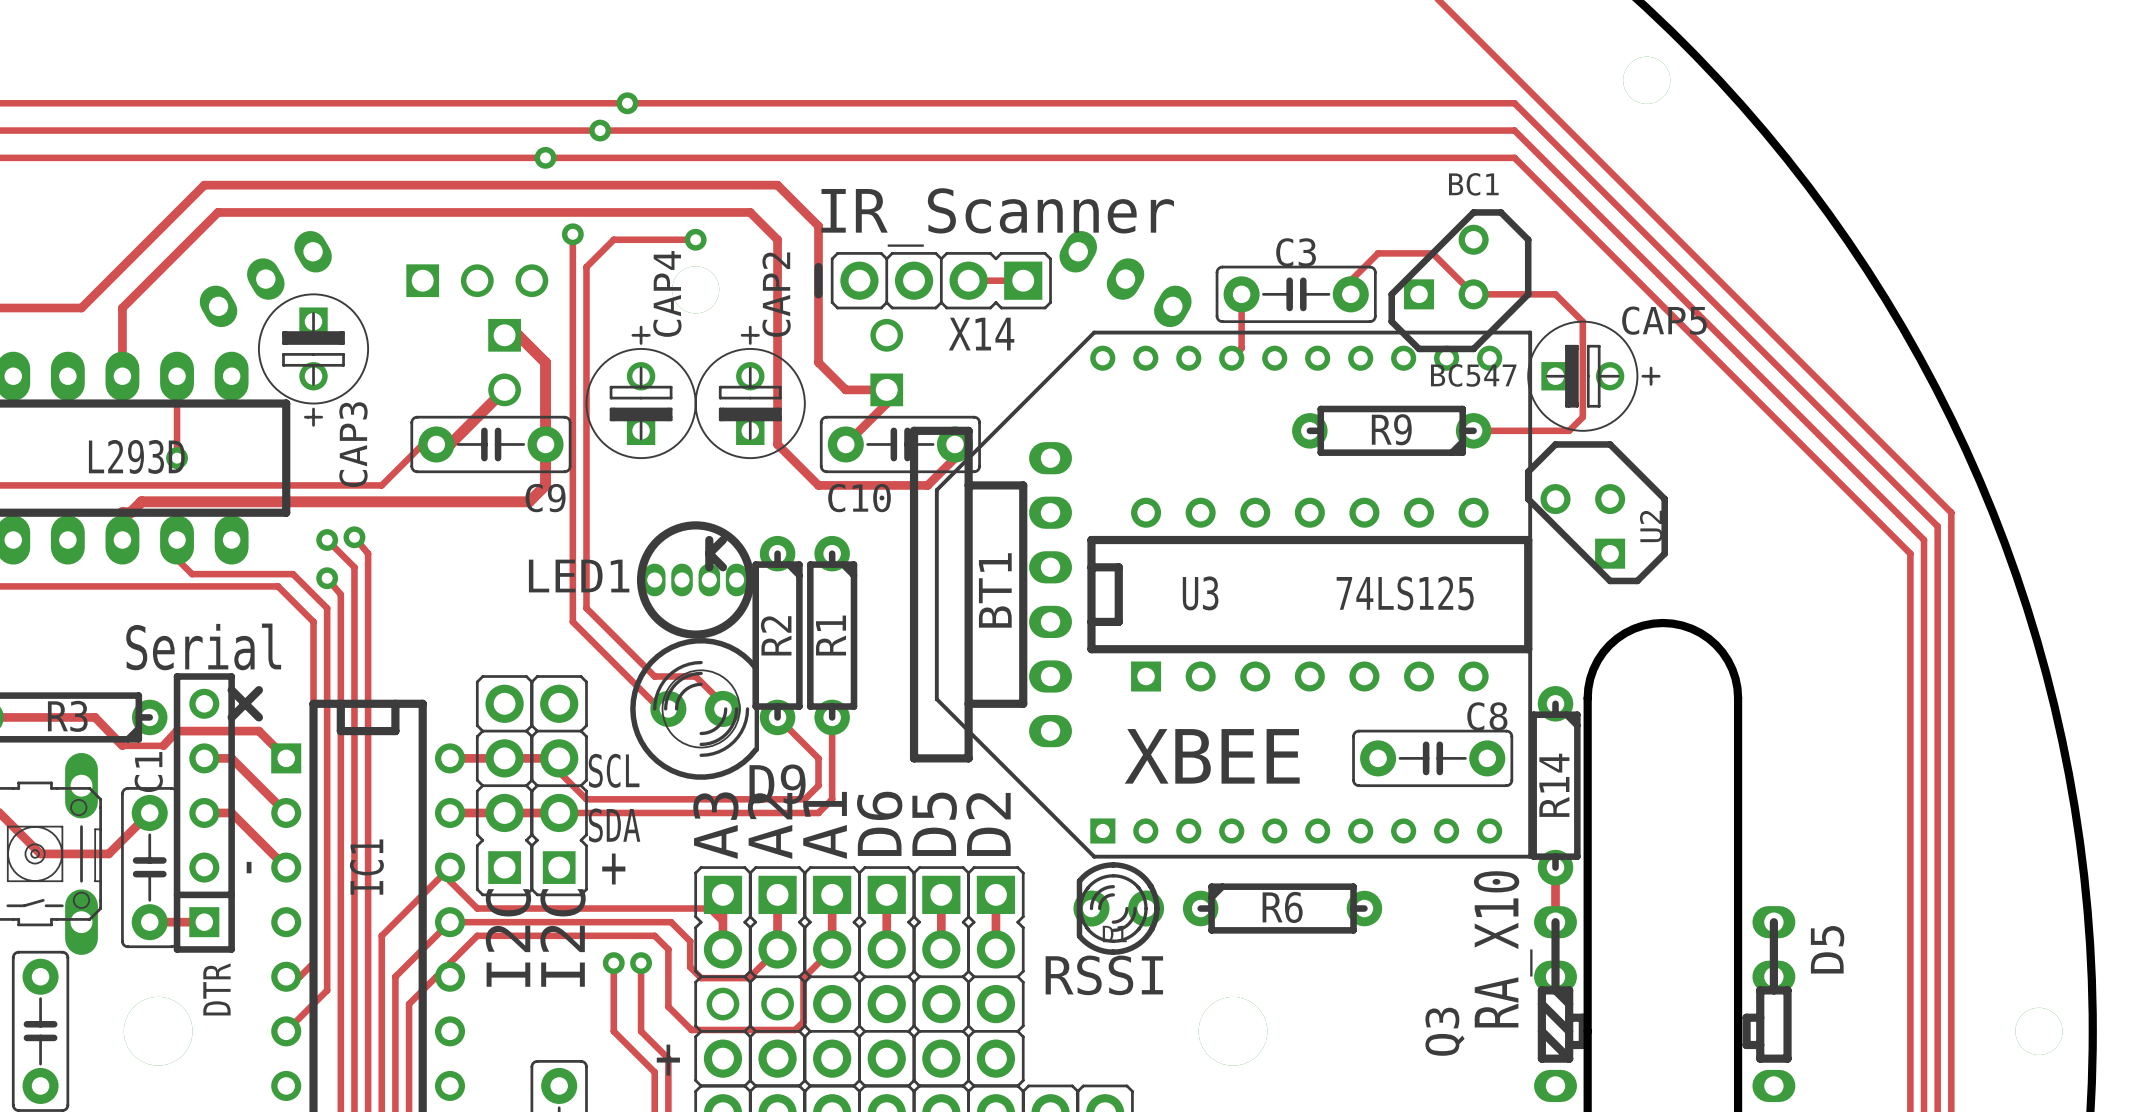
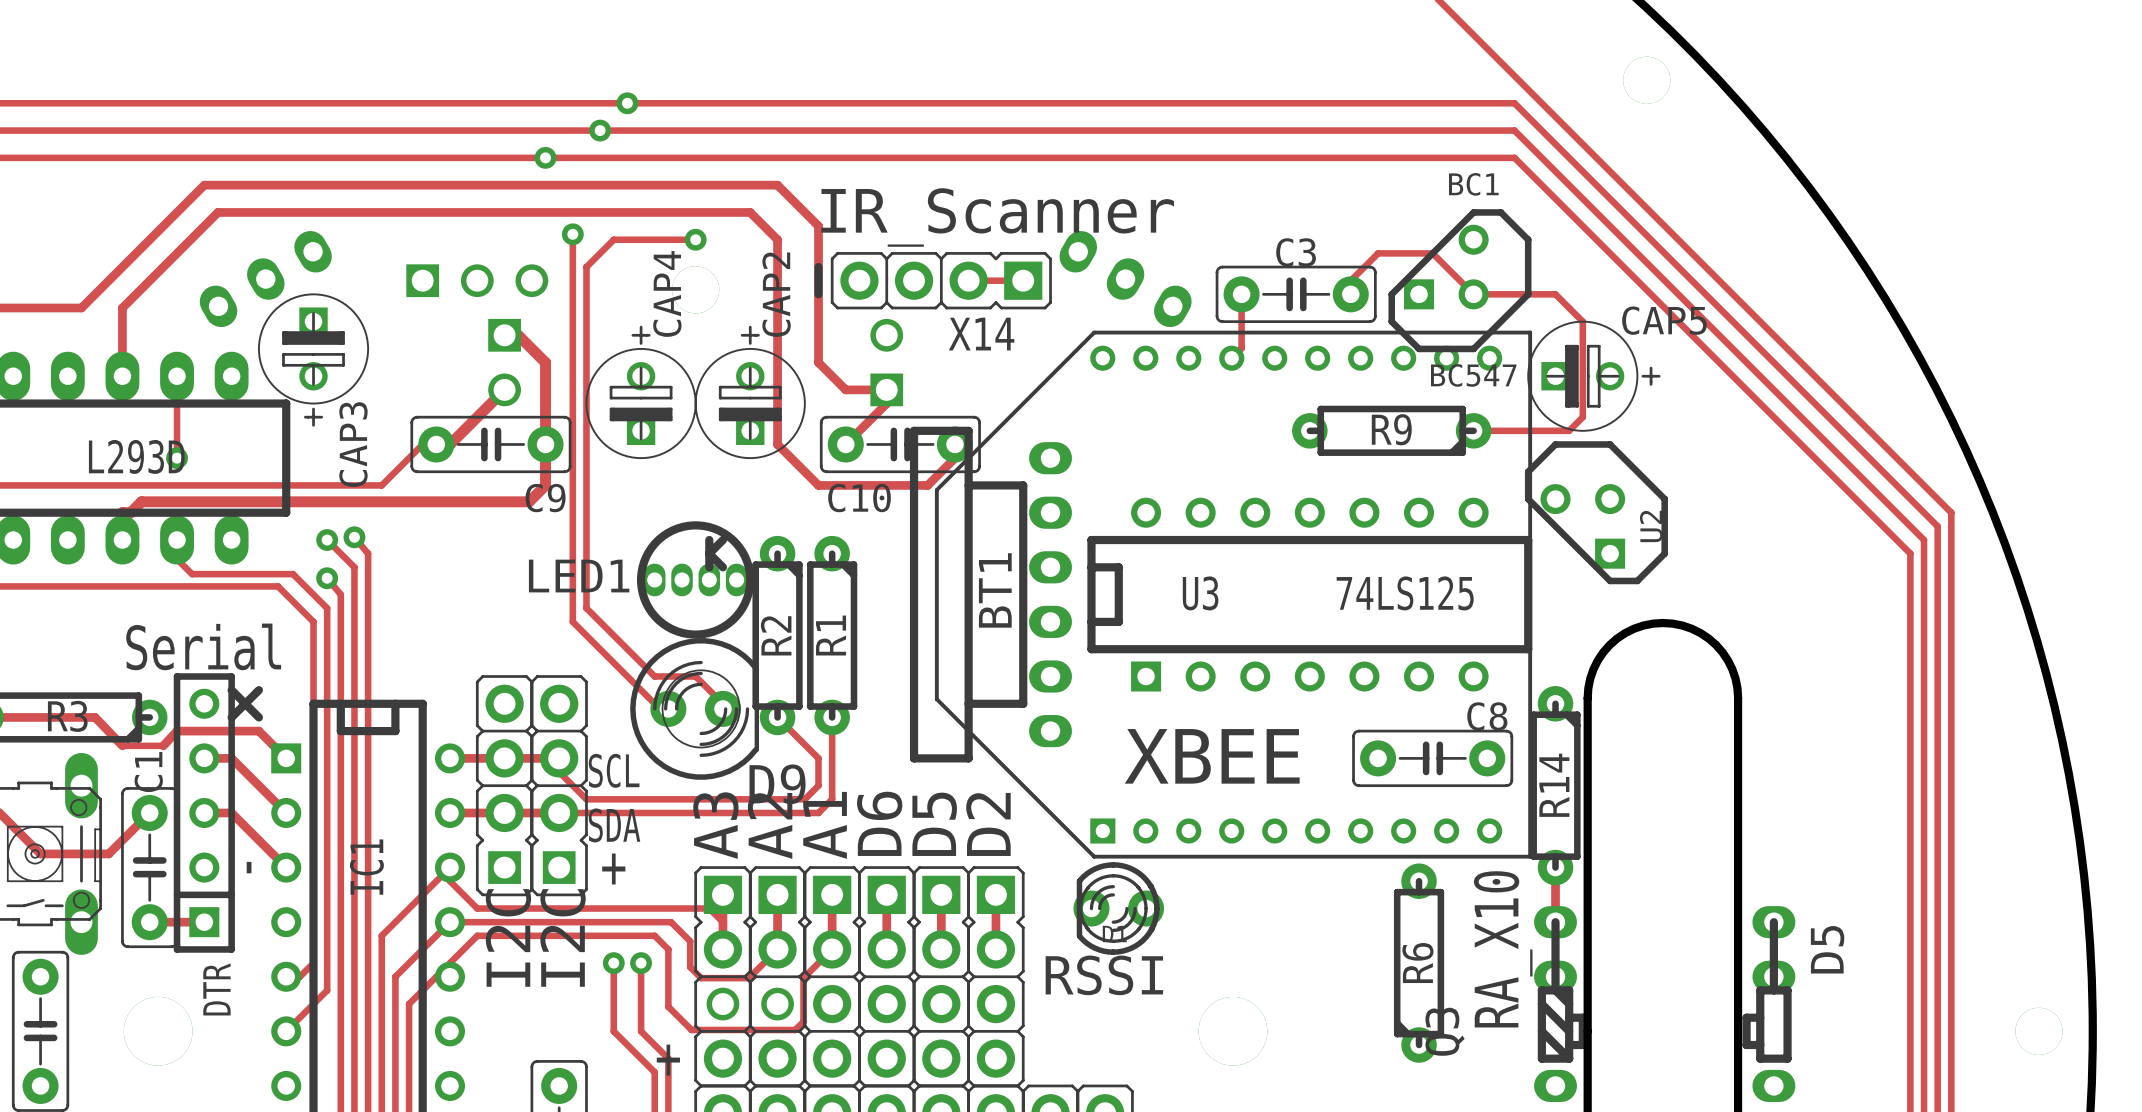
R6 rotation: 0° (1282, 908) -> 90° counterclockwise (1419, 963)
R6 position: (1282, 908) -> (1419, 963)

